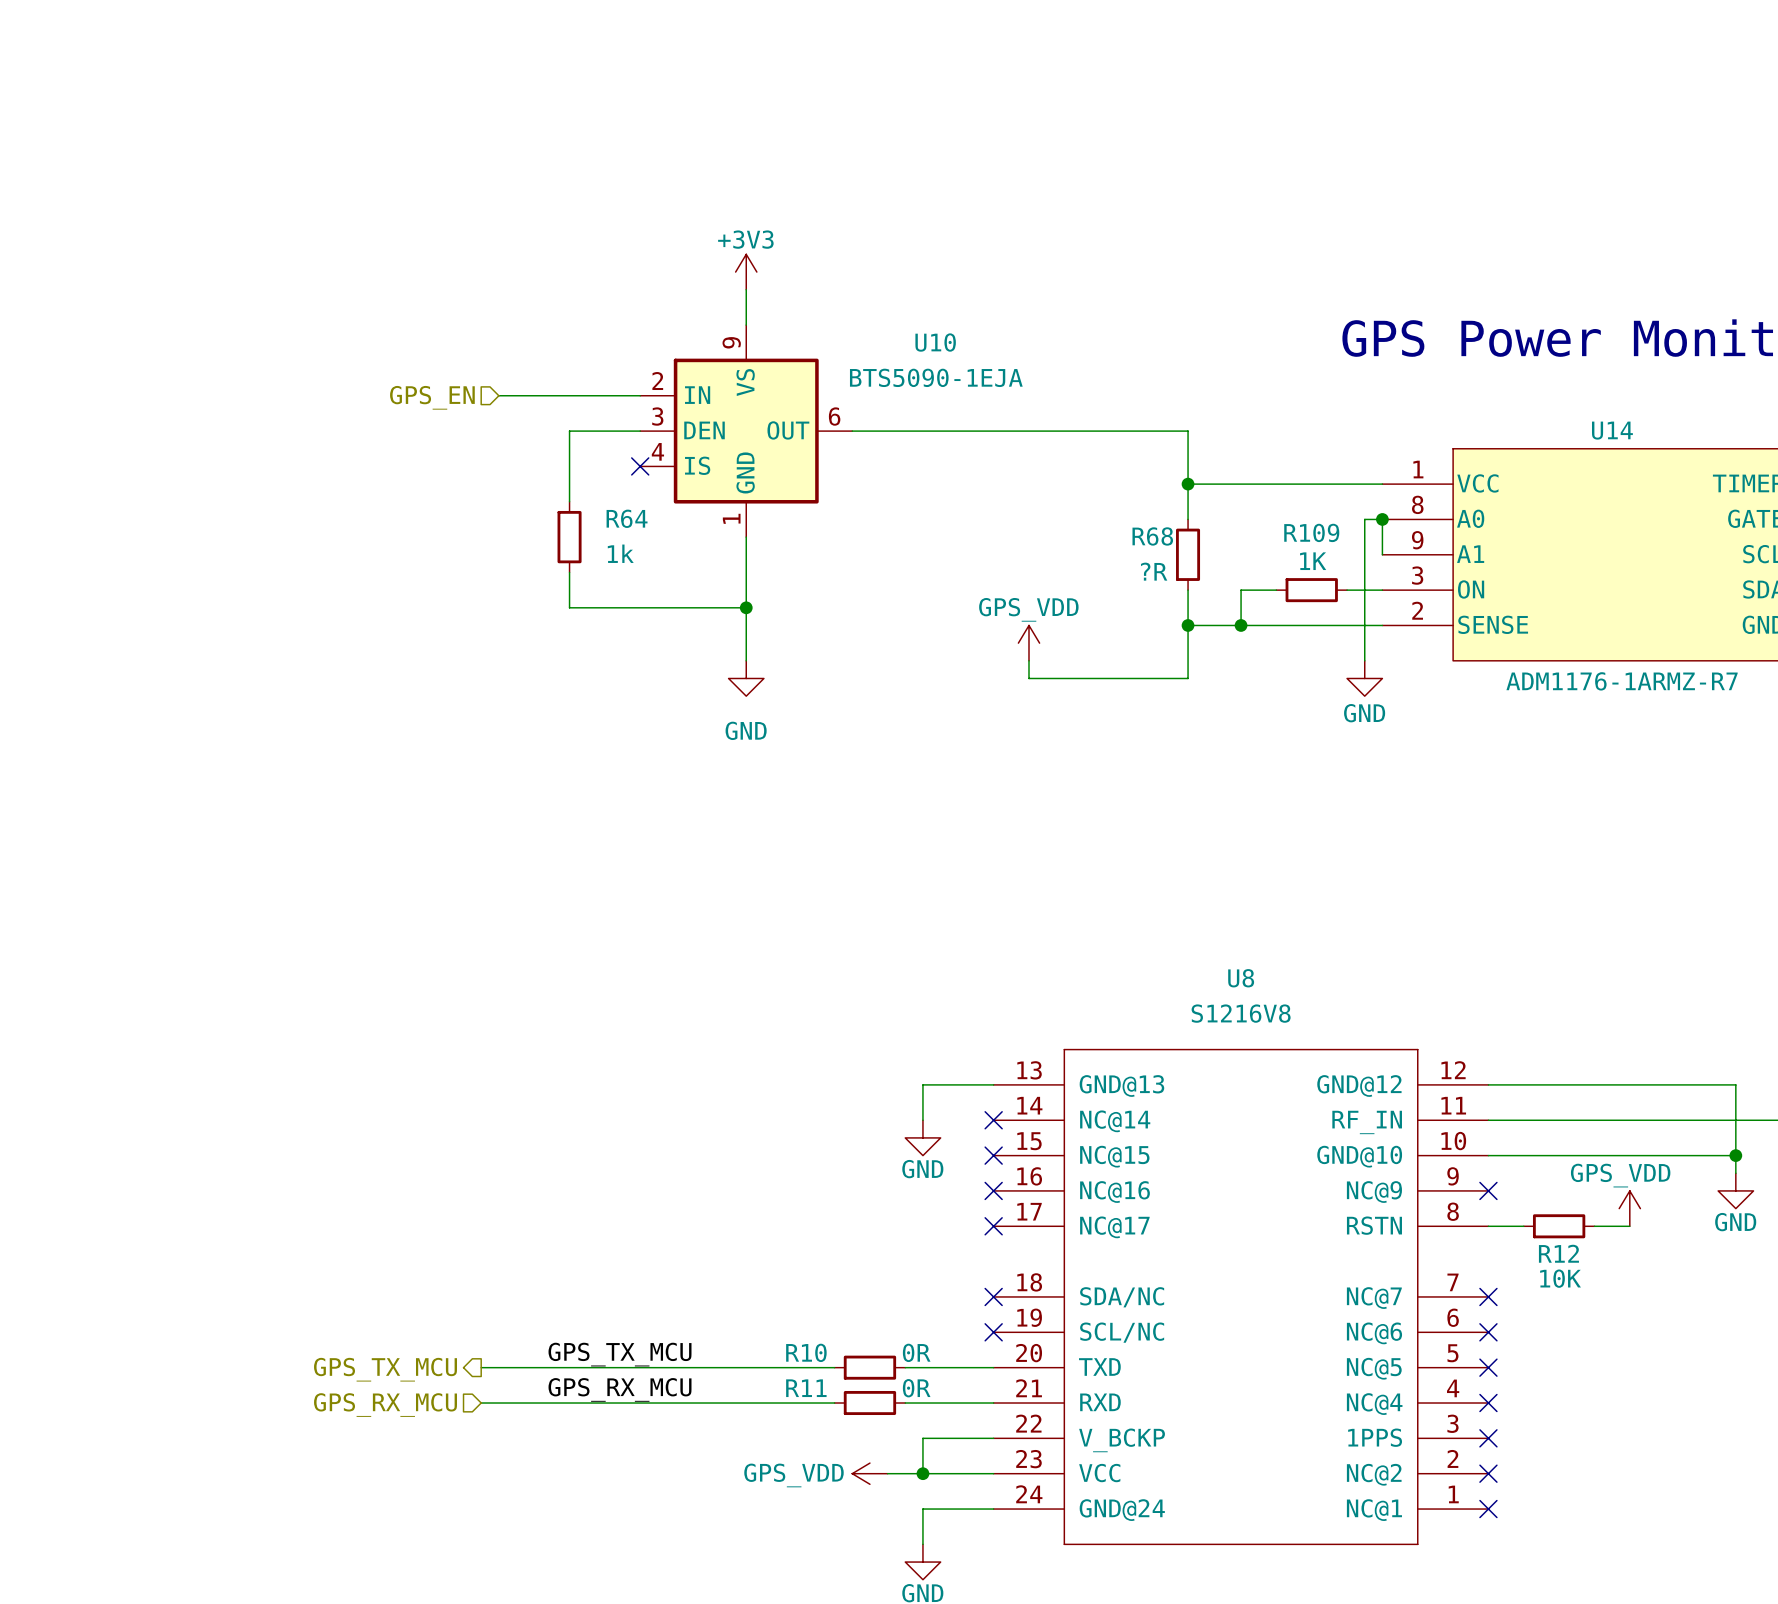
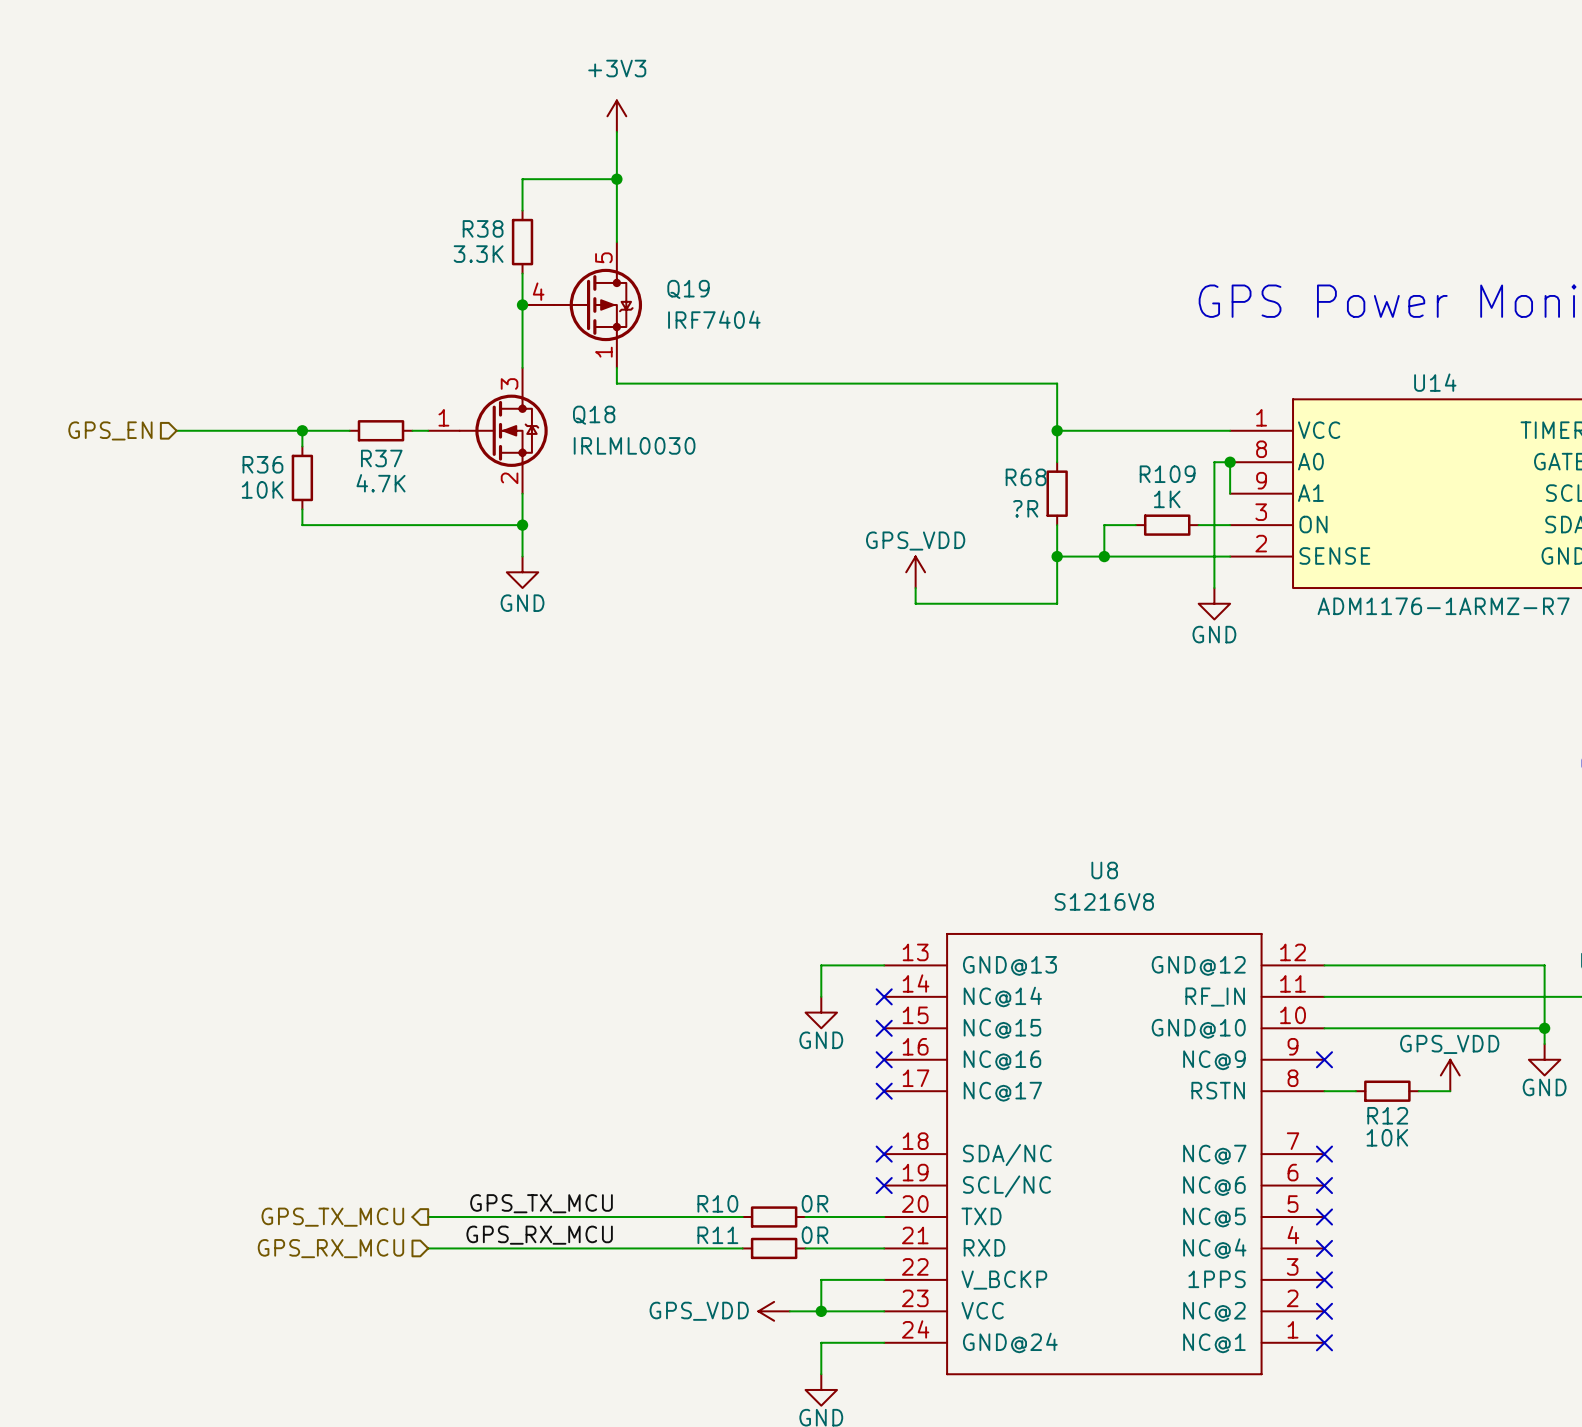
wire: none -> (616, 132) (616, 242)
wire: none -> (616, 179) (522, 179) (522, 210)
junction: none -> (616, 179)
power symbol text position: +3V3 (745, 239) -> +3V3 (617, 68)
R38: none -> 3.3K (522, 242)
power symbol position: +3V3 (746, 272) -> +3V3 (616, 116)
wire: (746, 289) (746, 325) -> none
wire: none -> (522, 273) (522, 367)
junction: none -> (522, 304)
Q19: none -> IRF7404 (582, 304)
wire: (498, 395) (640, 395) -> none
hierarchical label position: GPS_EN (432, 397) -> GPS_EN (110, 430)
wire: (640, 431) (569, 431) (569, 501) -> none
U10: BTS5090-1EJA (746, 431) -> none
no-connect mark: (640, 466) -> none
wire: none -> (176, 430) (349, 430)
wire: none -> (302, 430) (302, 446)
junction: none -> (302, 430)
R37: none -> 4.7K (381, 430)
wire: none -> (412, 430) (428, 430)
Q18: none -> IRLML0030 (487, 430)
R36: none -> 10K (302, 477)
R64: 1k (569, 537) -> none
wire: (746, 537) (746, 660) -> none
wire: none -> (522, 493) (522, 556)
wire: none -> (302, 509) (302, 525) (522, 525)
wire: (569, 572) (569, 607) (746, 607) -> none
junction: none -> (522, 525)
junction: (746, 607) -> none
power symbol position: GND (746, 678) -> GND (522, 572)
power symbol text position: GND (746, 730) -> GND (522, 603)

